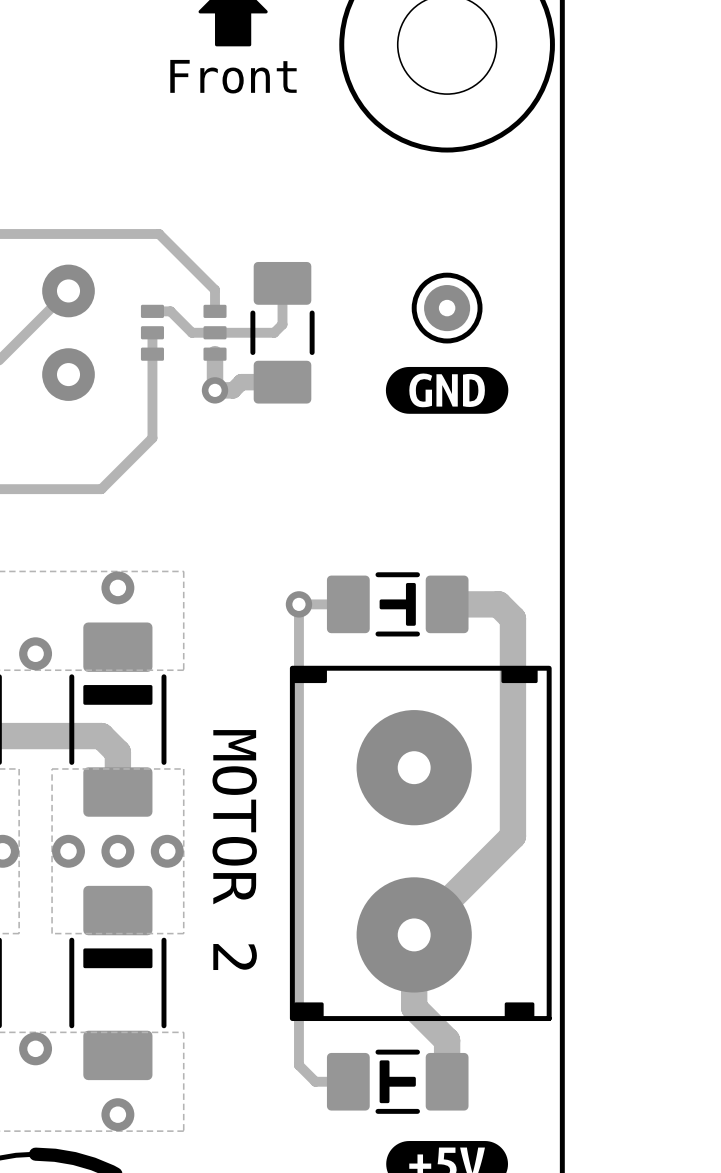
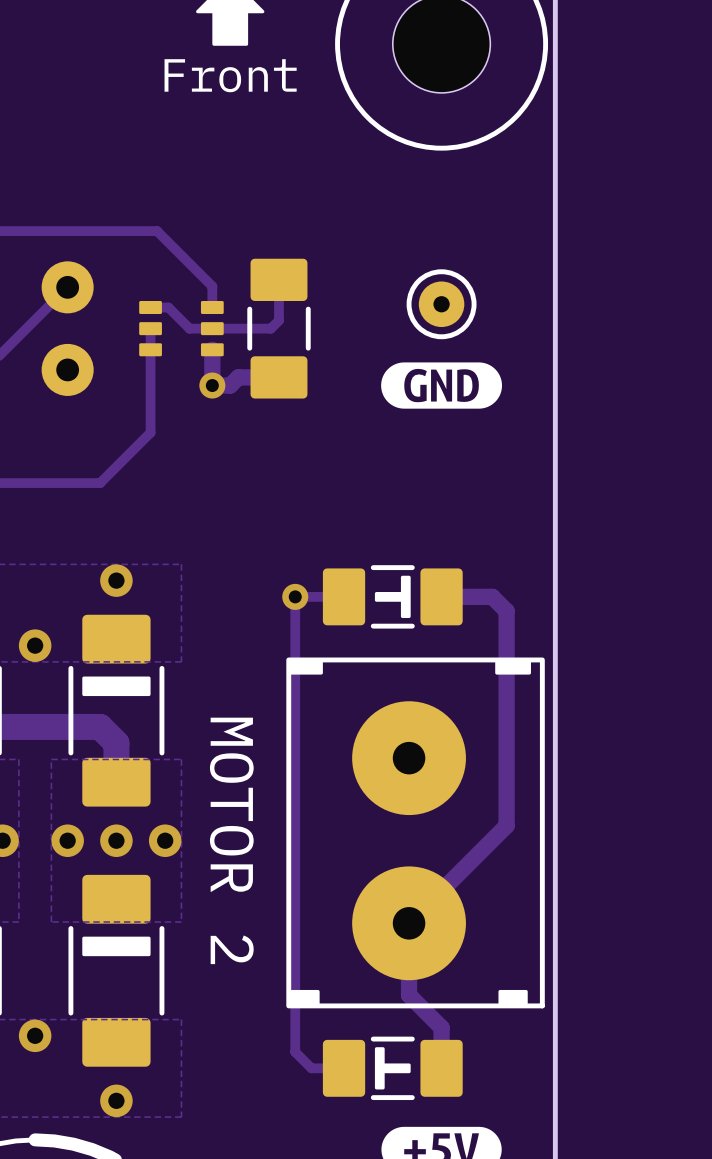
track width: thick (447, 604) (498, 604) (512, 618) (512, 836) (414, 934) (414, 1007) (447, 1040) (447, 1081) -> thin (441, 596) (492, 596) (506, 611) (506, 825) (409, 923) (409, 995) (441, 1027) (441, 1068)

